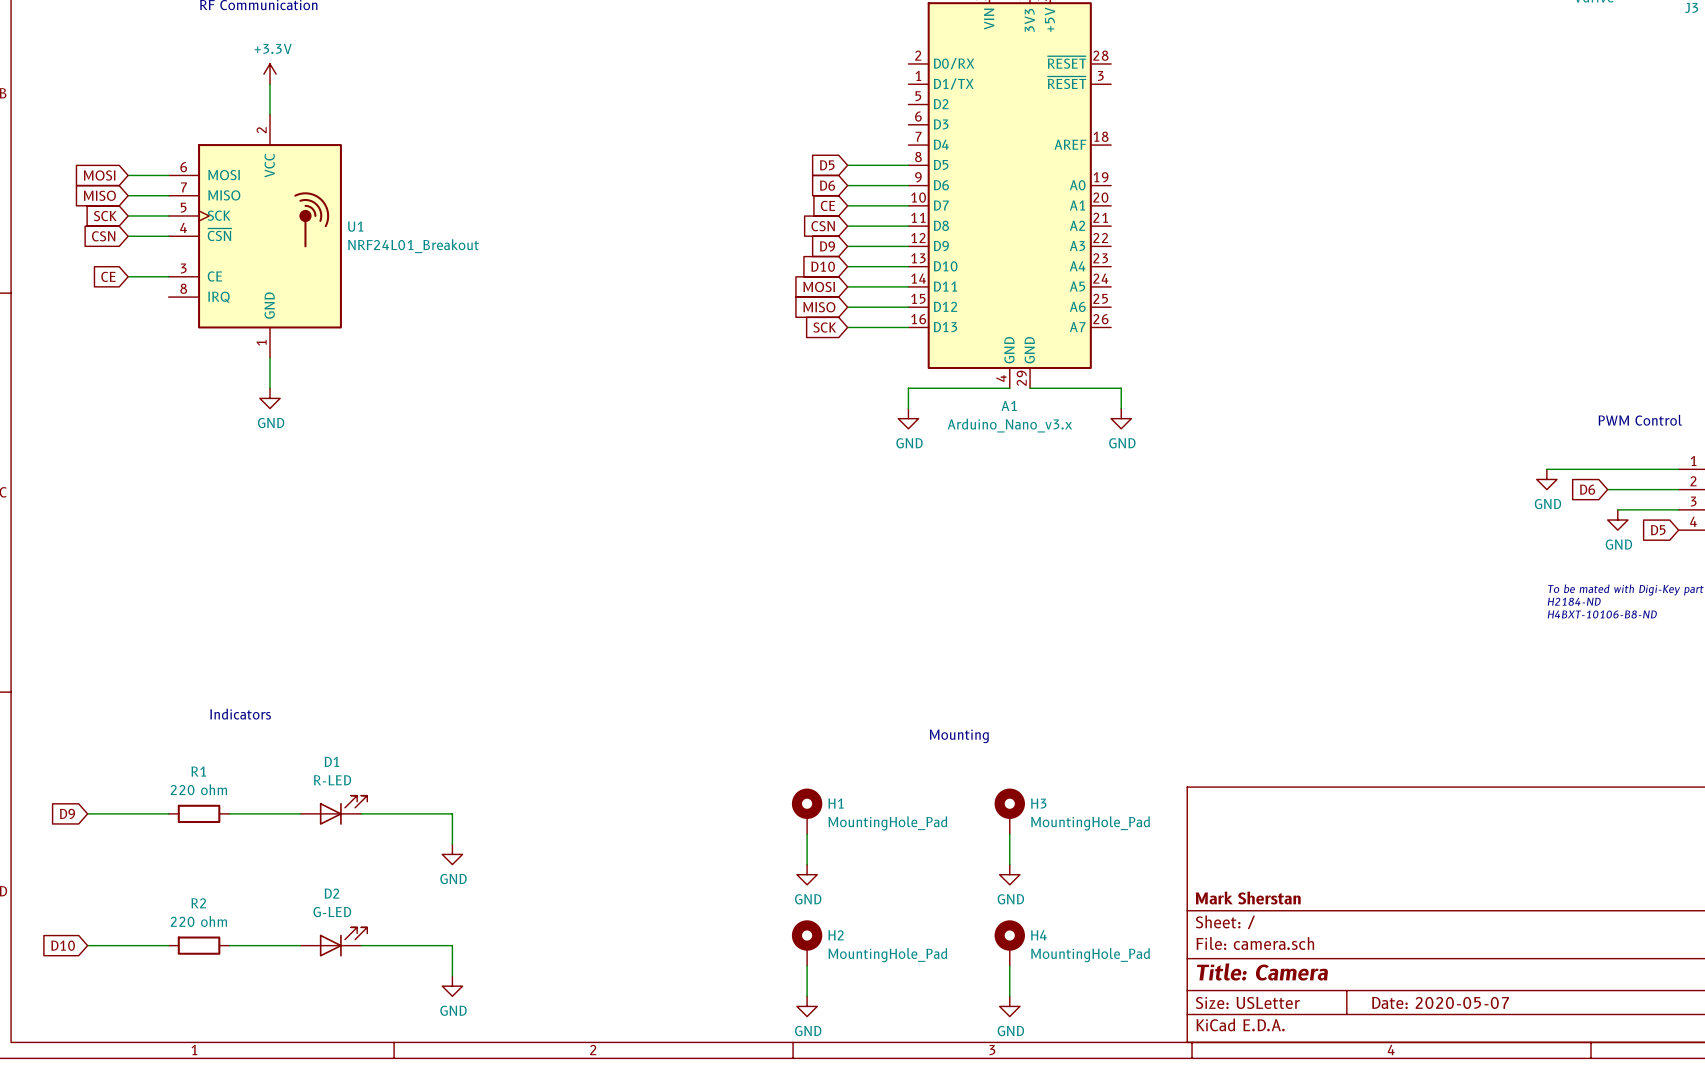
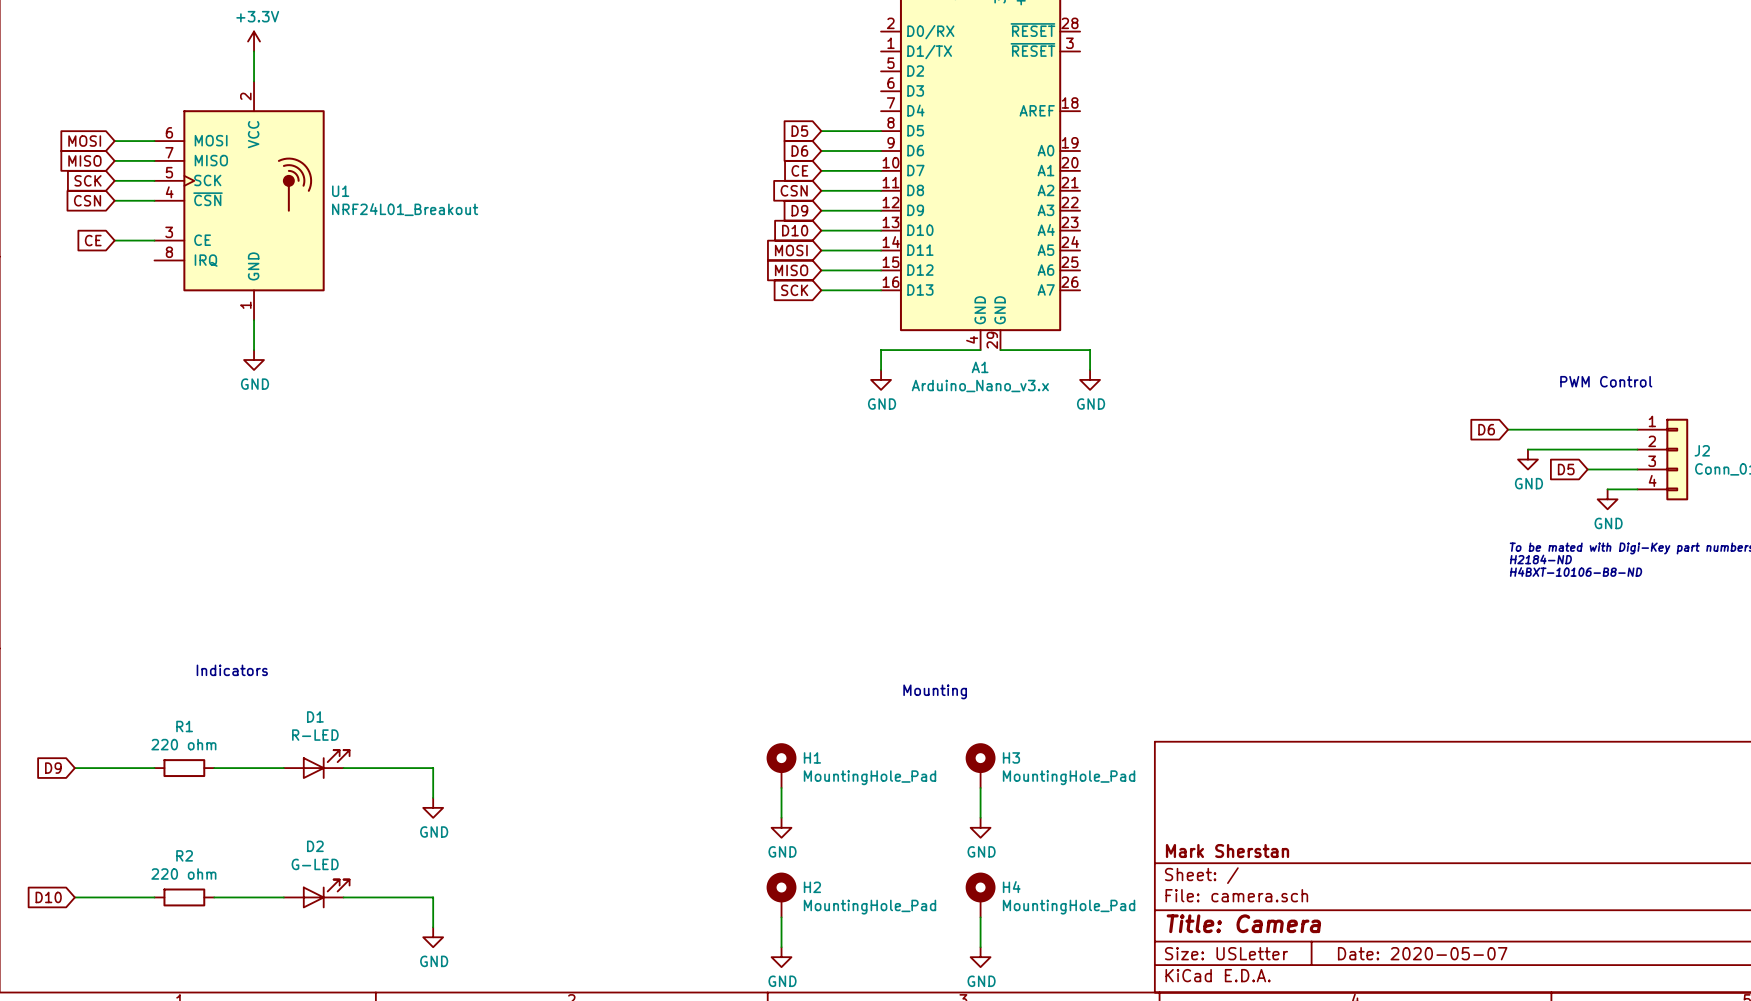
power symbol: GND (1546, 479) -> none
wire: none -> (1527, 449) (1567, 449)
global label position: D6 (1587, 489) -> D6 (1486, 429)
power symbol: none -> GND (1527, 459)
wire: (1617, 509) (1627, 509) -> none
power symbol: GND (1617, 520) -> none
wire: none -> (1607, 489) (1637, 489)
global label position: D5 (1658, 530) -> D5 (1566, 469)
power symbol: none -> GND (1607, 499)

